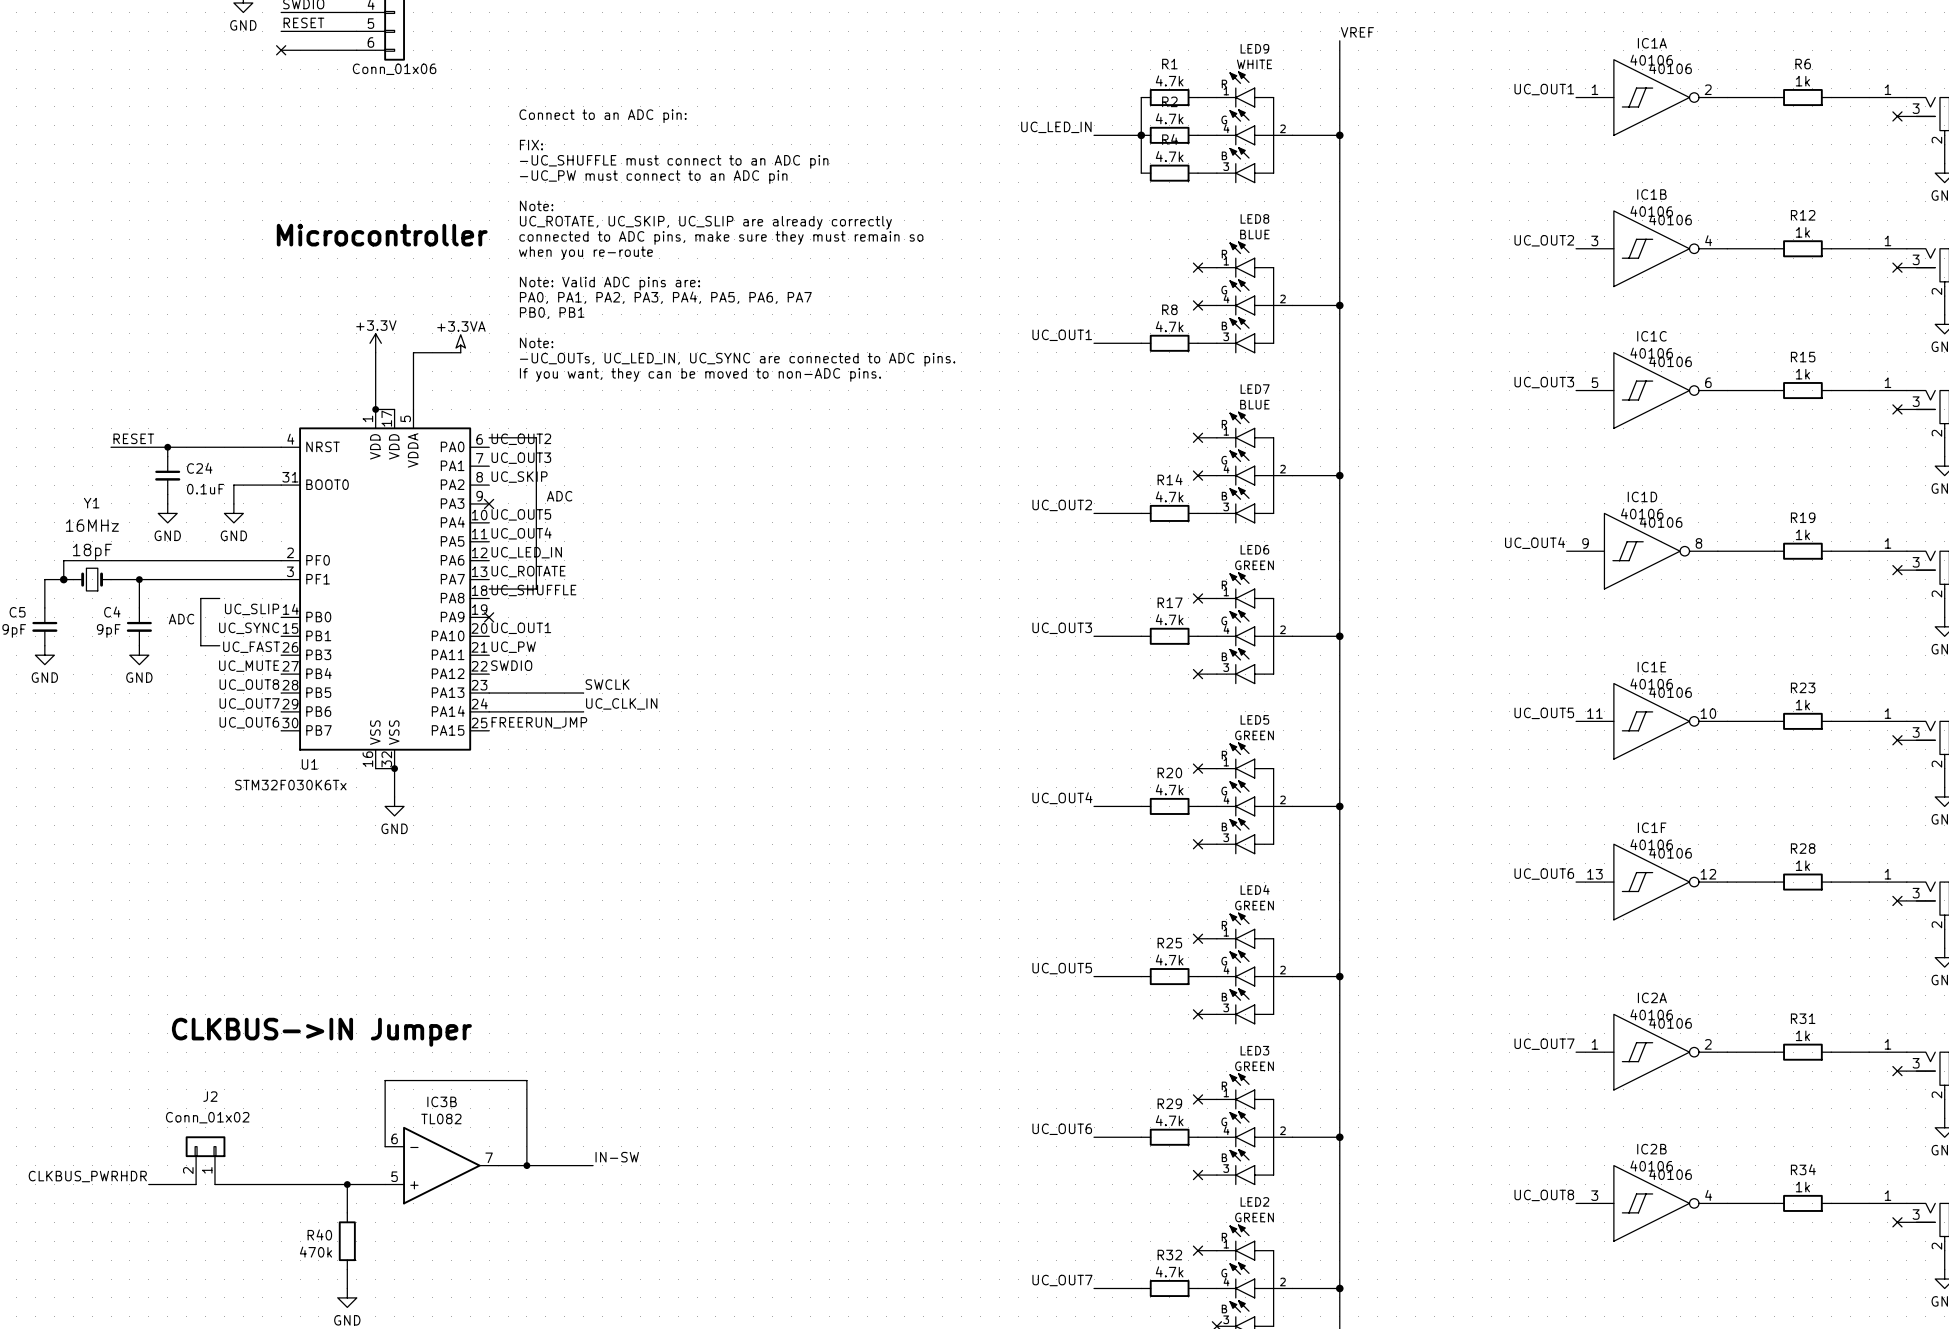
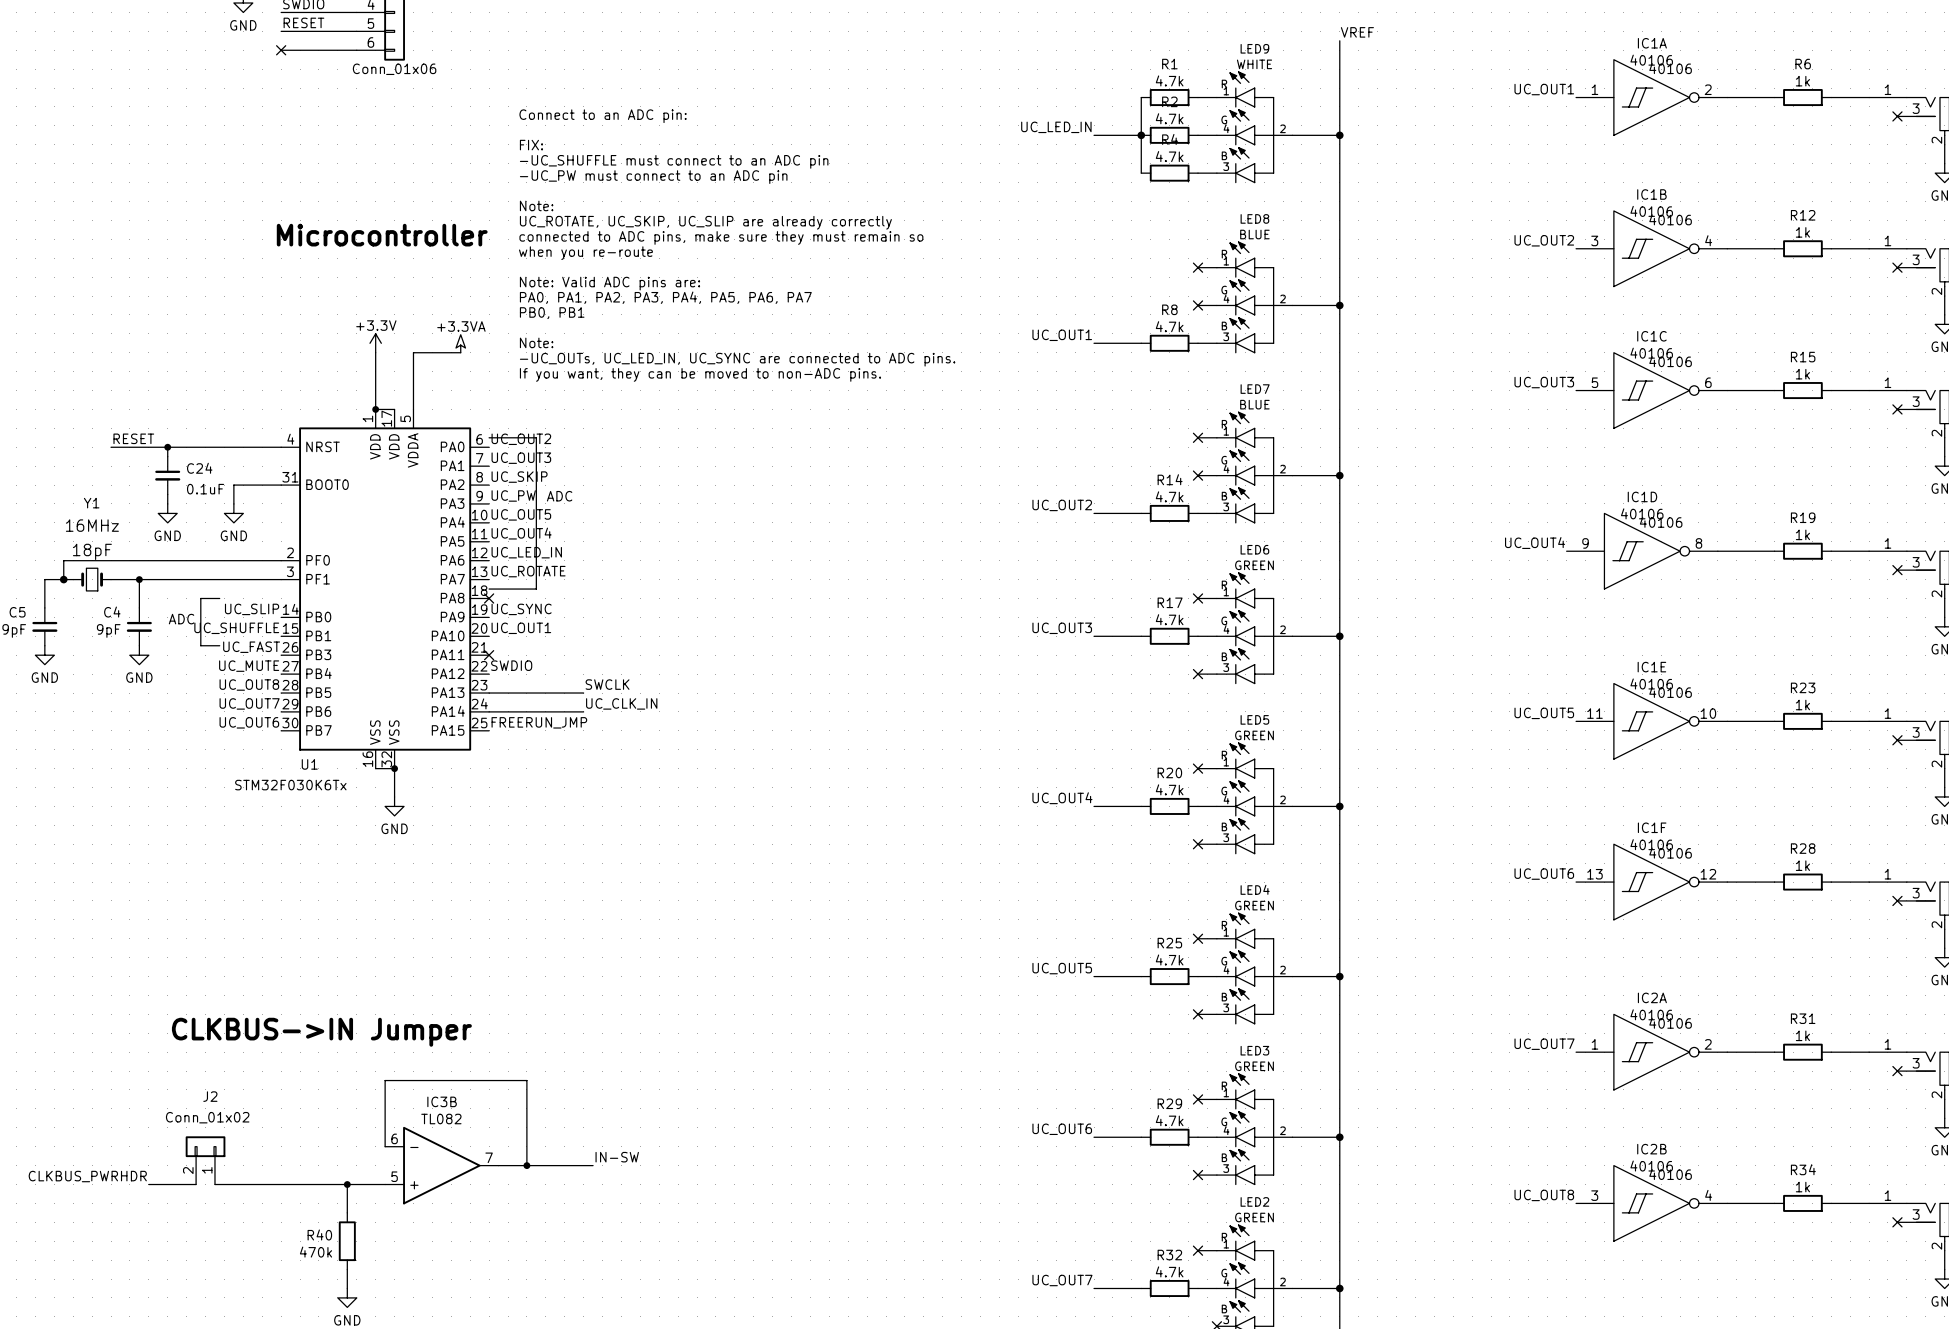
no-connect mark: (489, 503) -> none
label: UC_SHUFFLE (533, 590) -> none
no-connect mark: none -> (489, 598)
label: none -> UC_SYNC (521, 609)
no-connect mark: (489, 617) -> none
label: UC_SYNC (249, 628) -> UC_SHUFFLE (236, 628)
label position: UC_PW (513, 647) -> UC_PW (513, 495)
no-connect mark: none -> (489, 655)

